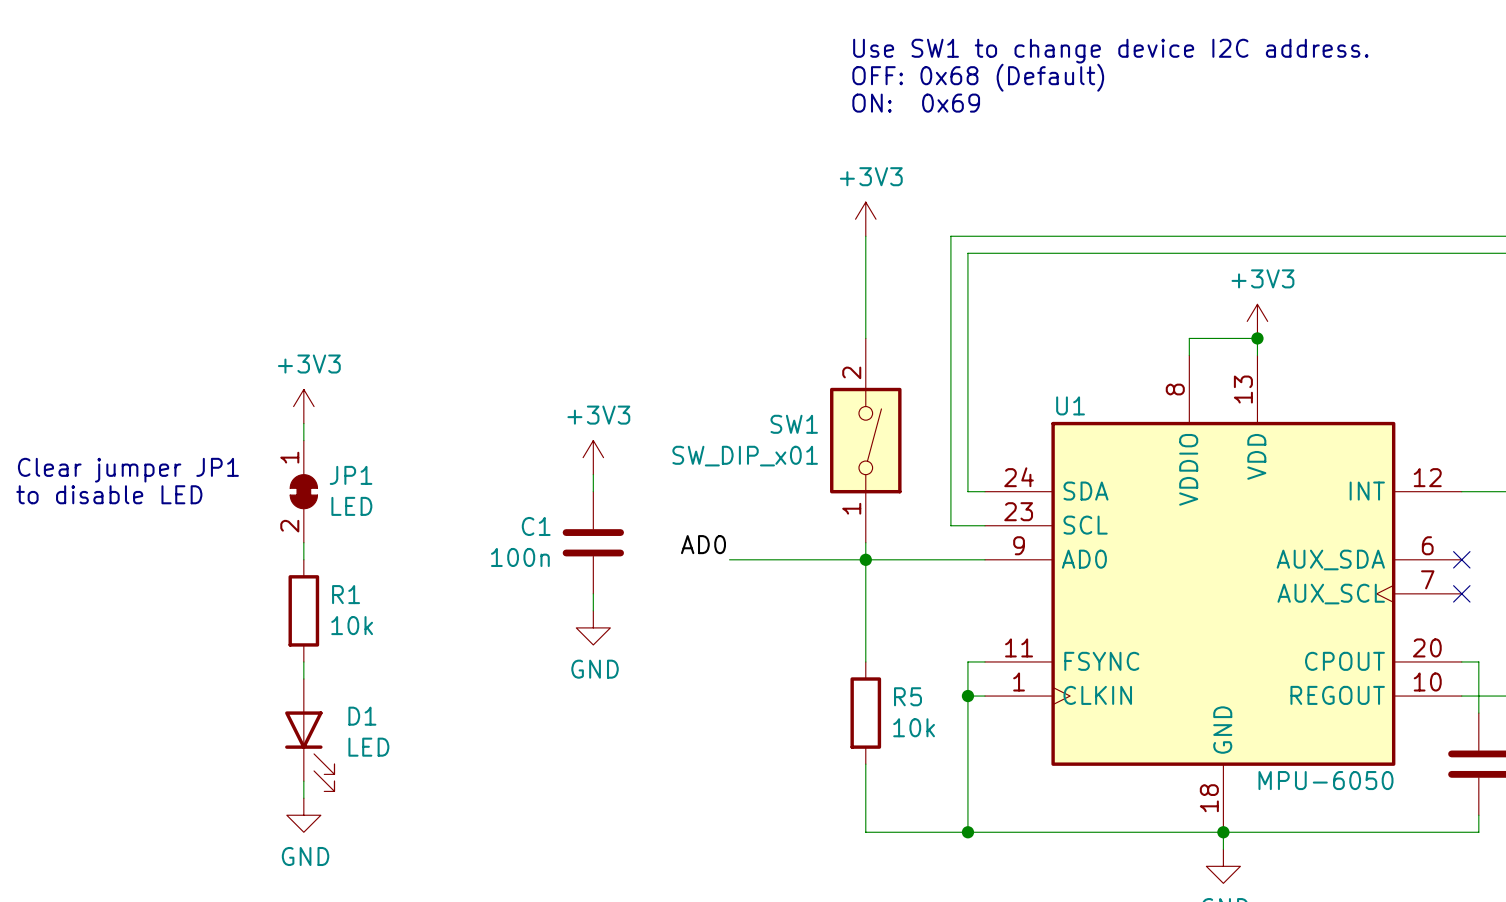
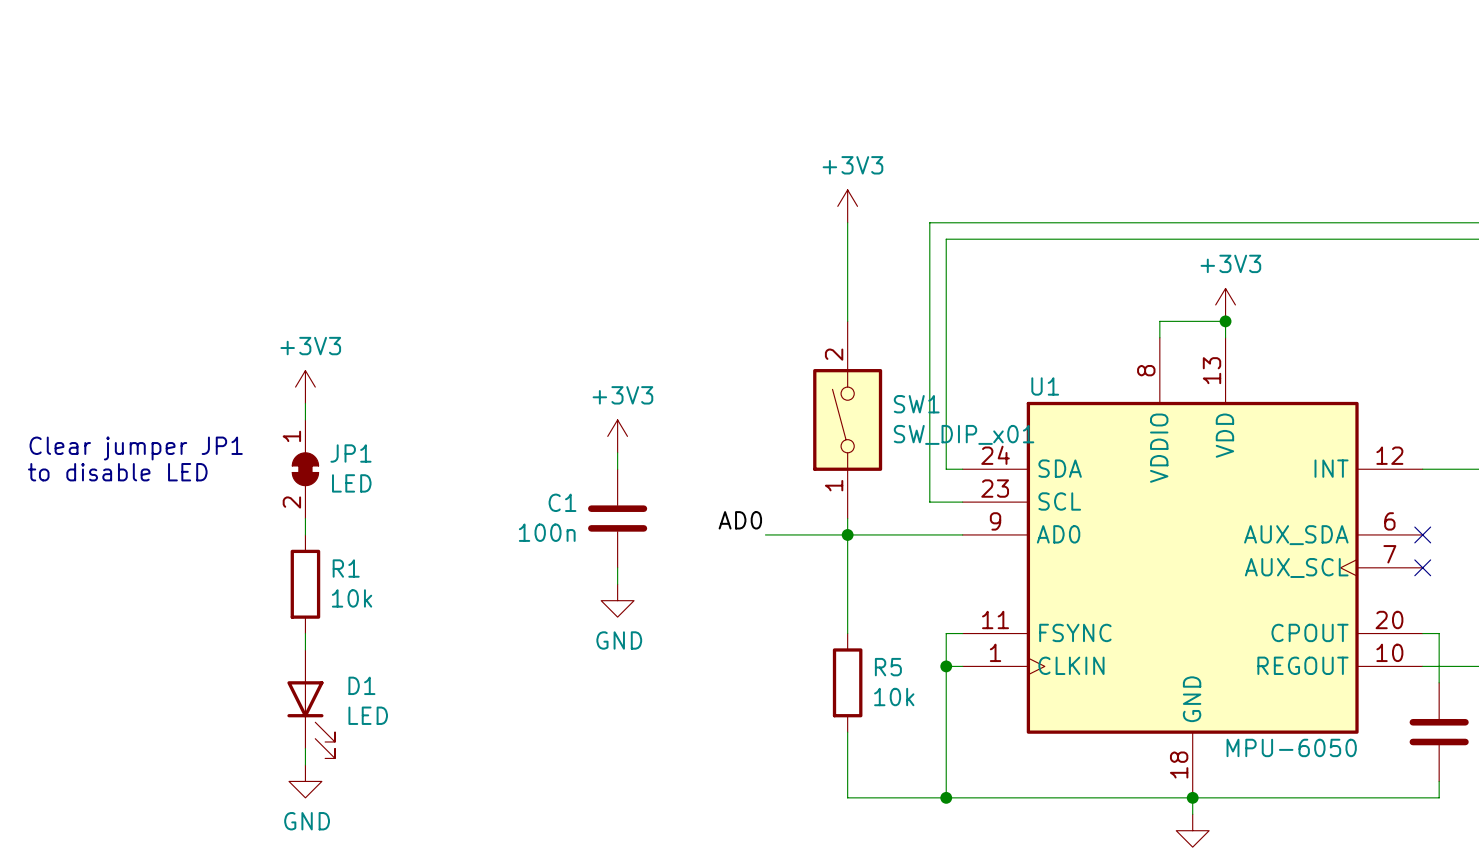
text: Use SW1 to change device I2C address. (1110, 51) -> none
text: OFF: 0x68 (Default) (978, 77) -> none
text: ON: 0x69 (916, 103) -> none
SW1 flip: as is (865, 440) -> left-right (847, 419)
power symbol position: +3V3 (593, 457) -> +3V3 (617, 436)
wire: (593, 474) (593, 491) -> (617, 452) (617, 469)
C1 position: (593, 542) -> (617, 518)
label position: AD0 (703, 544) -> AD0 (740, 520)
wire: (729, 559) (780, 559) -> none
wire: (593, 593) (593, 610) -> (617, 567) (617, 584)
power symbol position: GND (593, 627) -> GND (617, 600)

